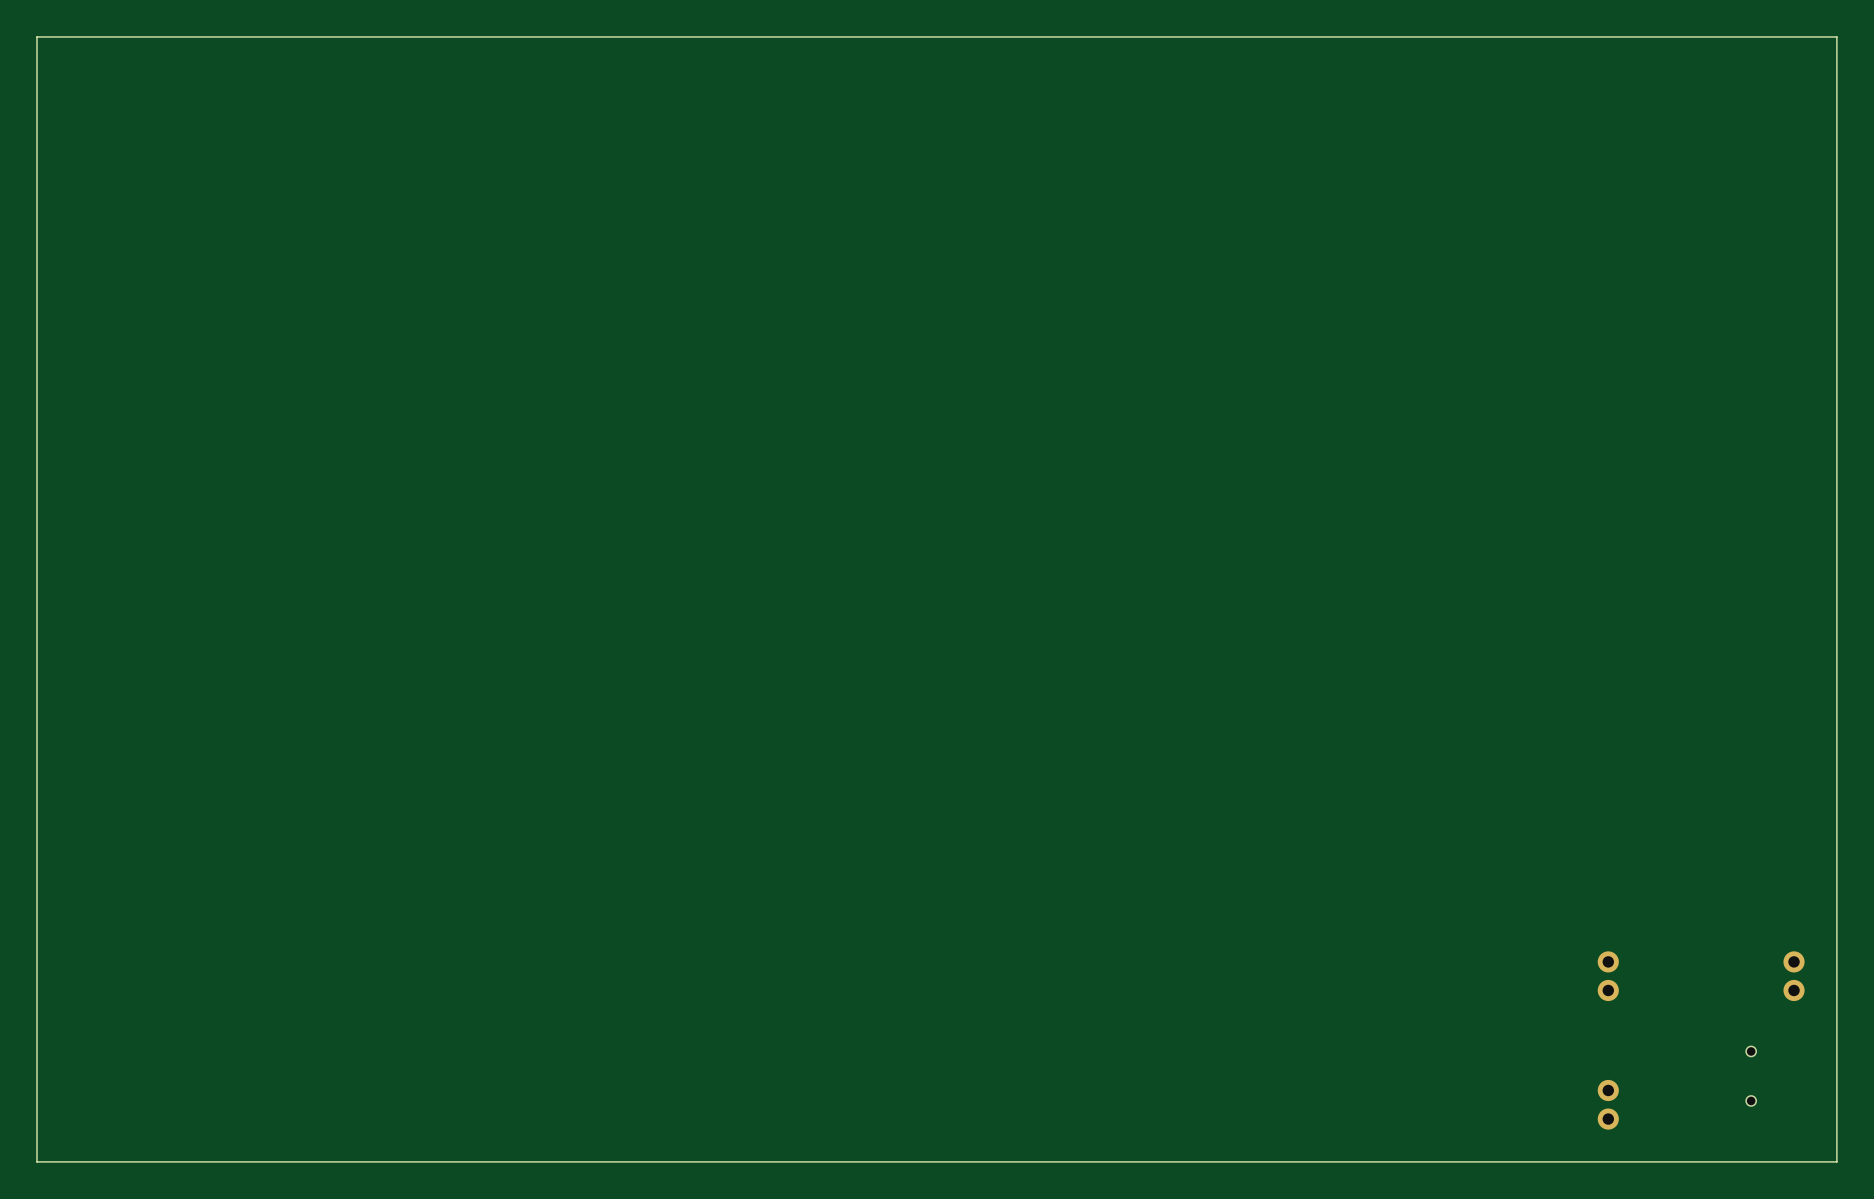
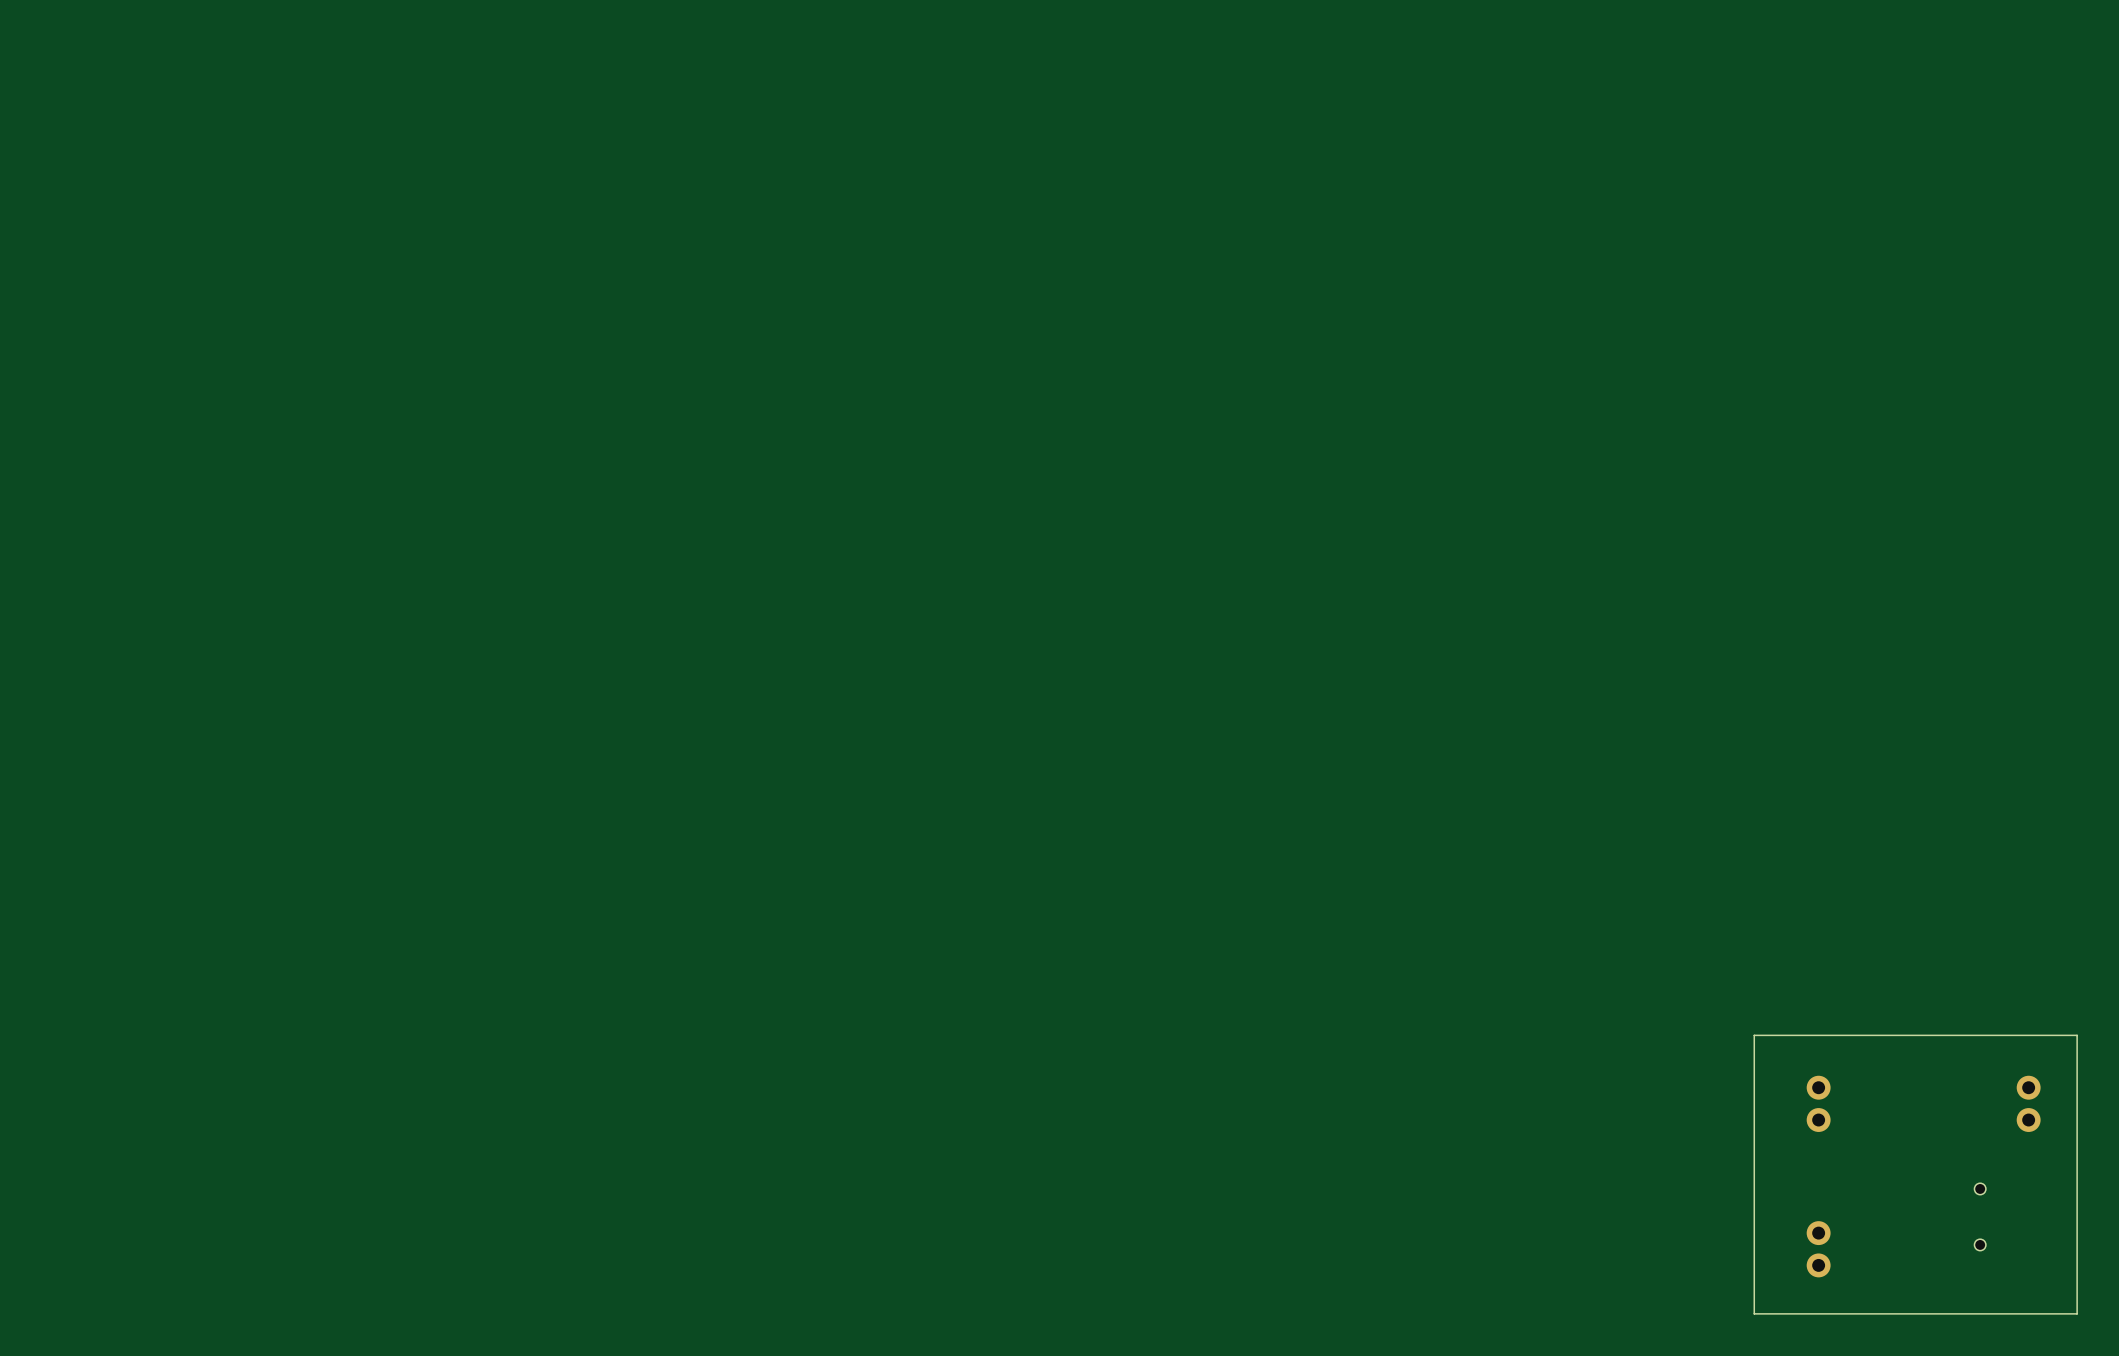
board edge: (1836, 915) (1836, 36) (36, 36) (36, 1161) (1551, 1161) -> (2077, 1035) (1754, 1035) (1754, 1313)

